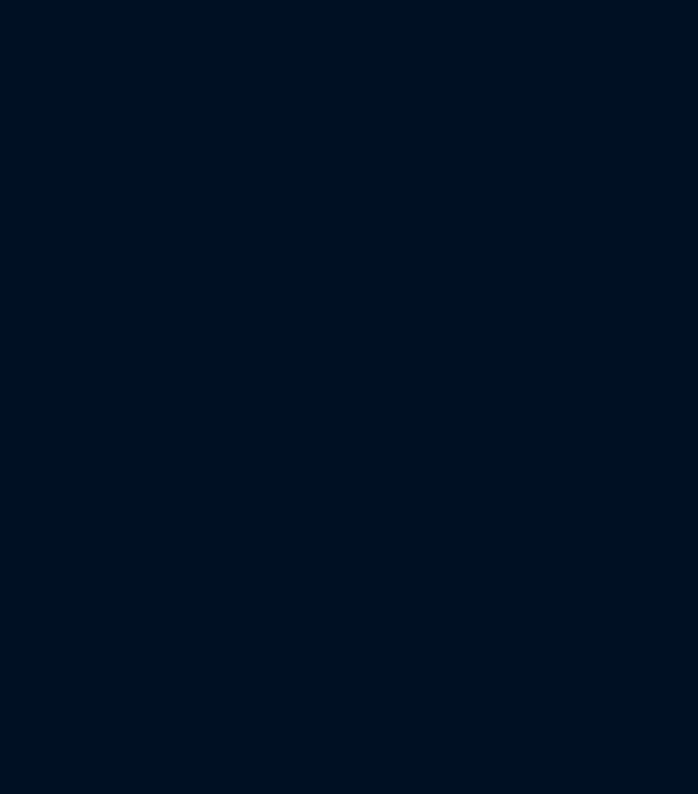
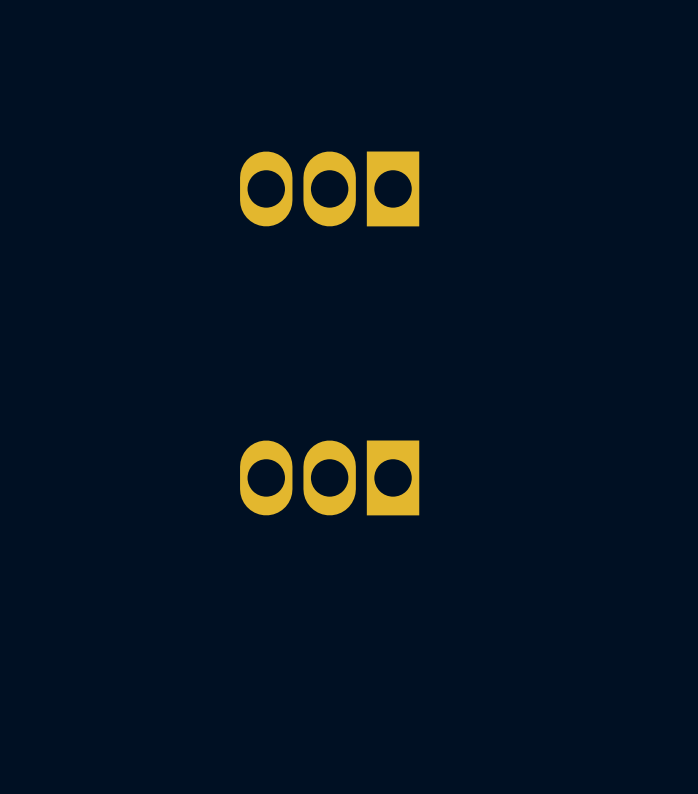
part: none -> (329, 188)
part: none -> (329, 477)

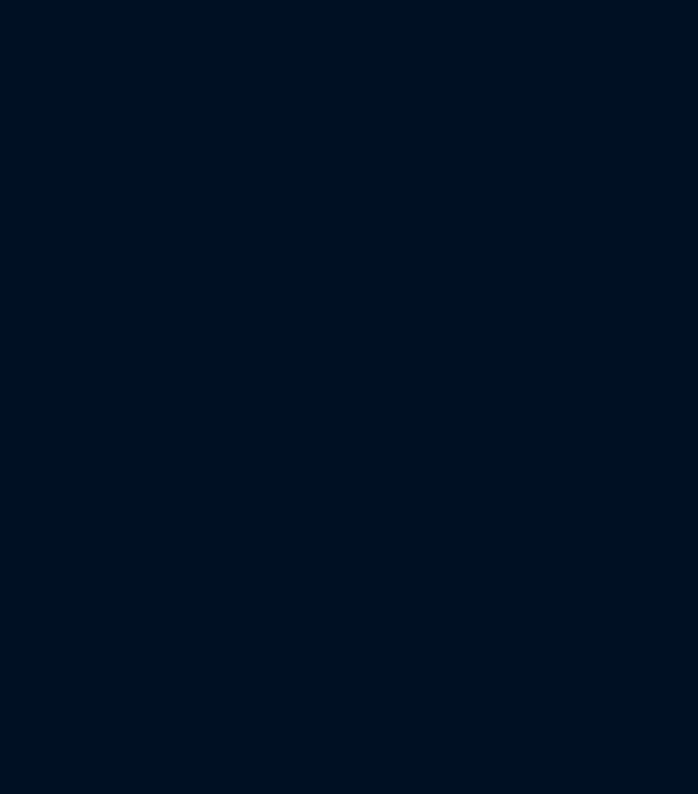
part: (329, 188) -> none
part: (329, 477) -> none

